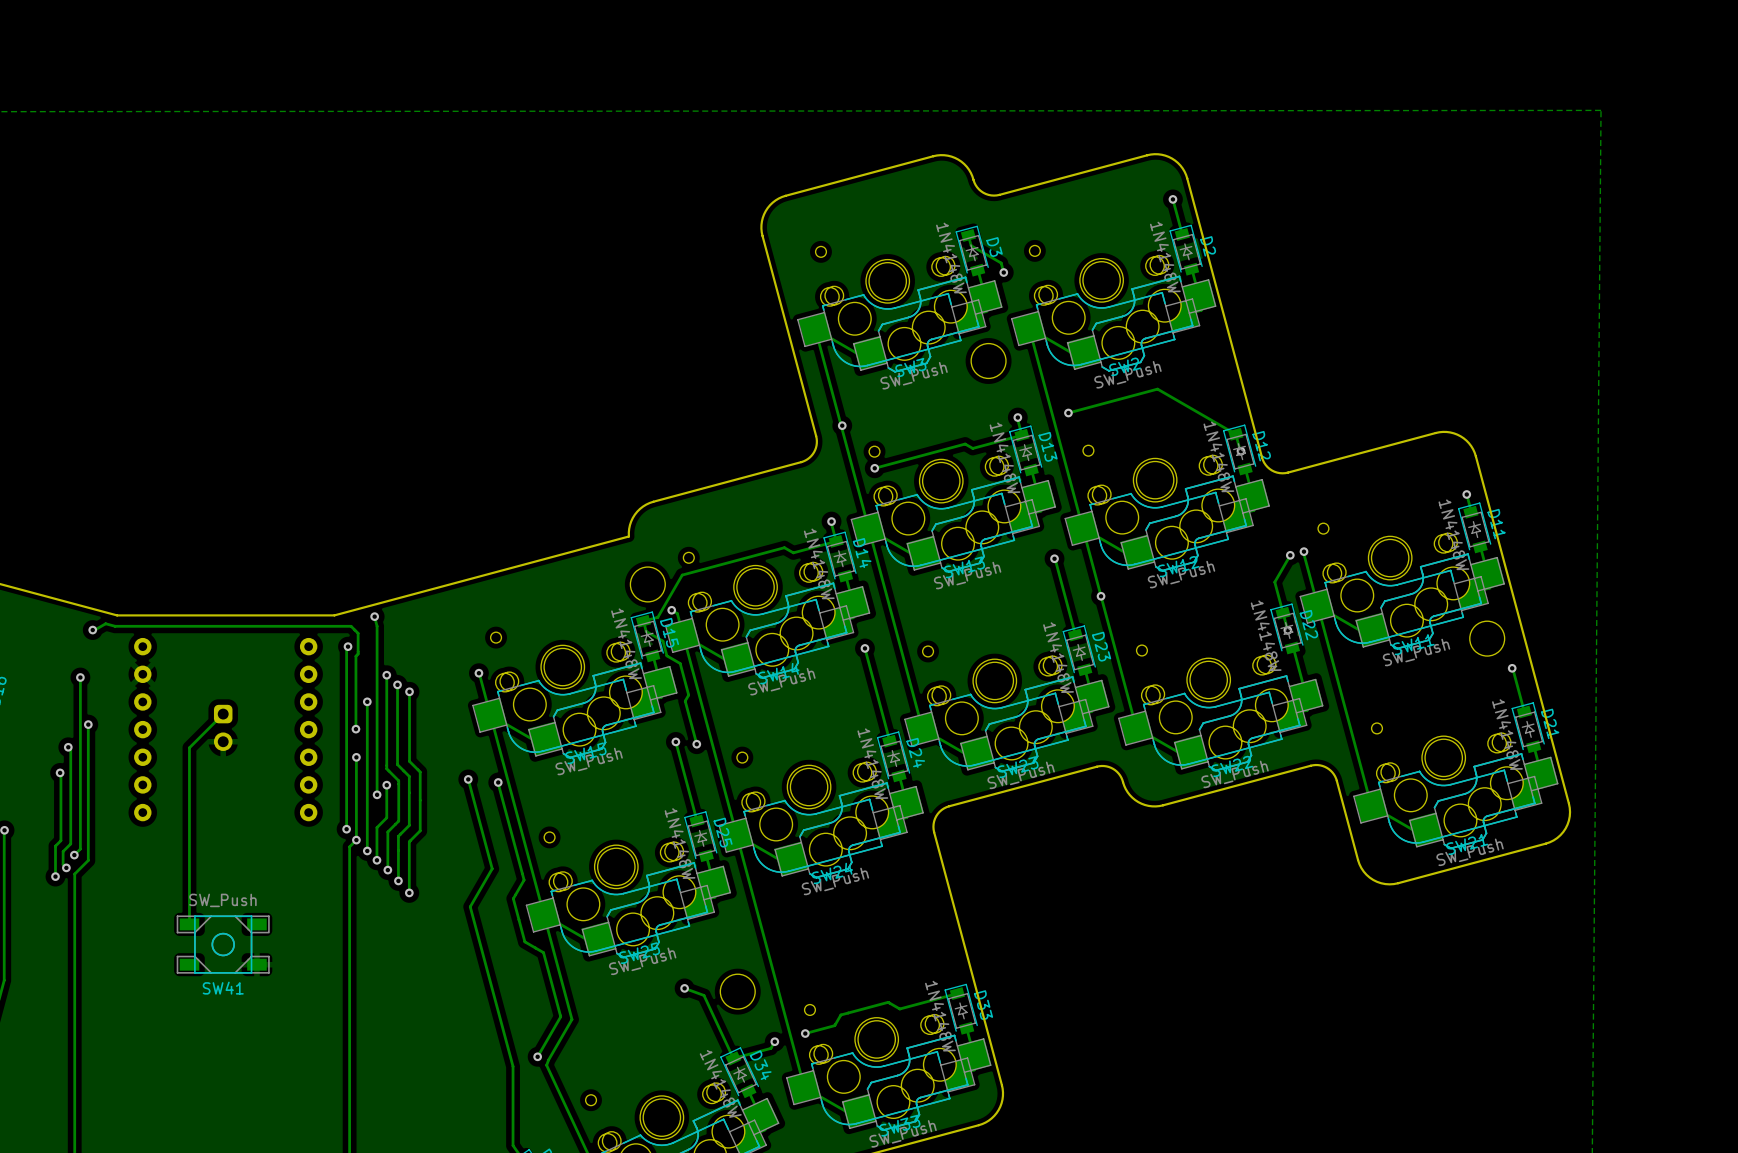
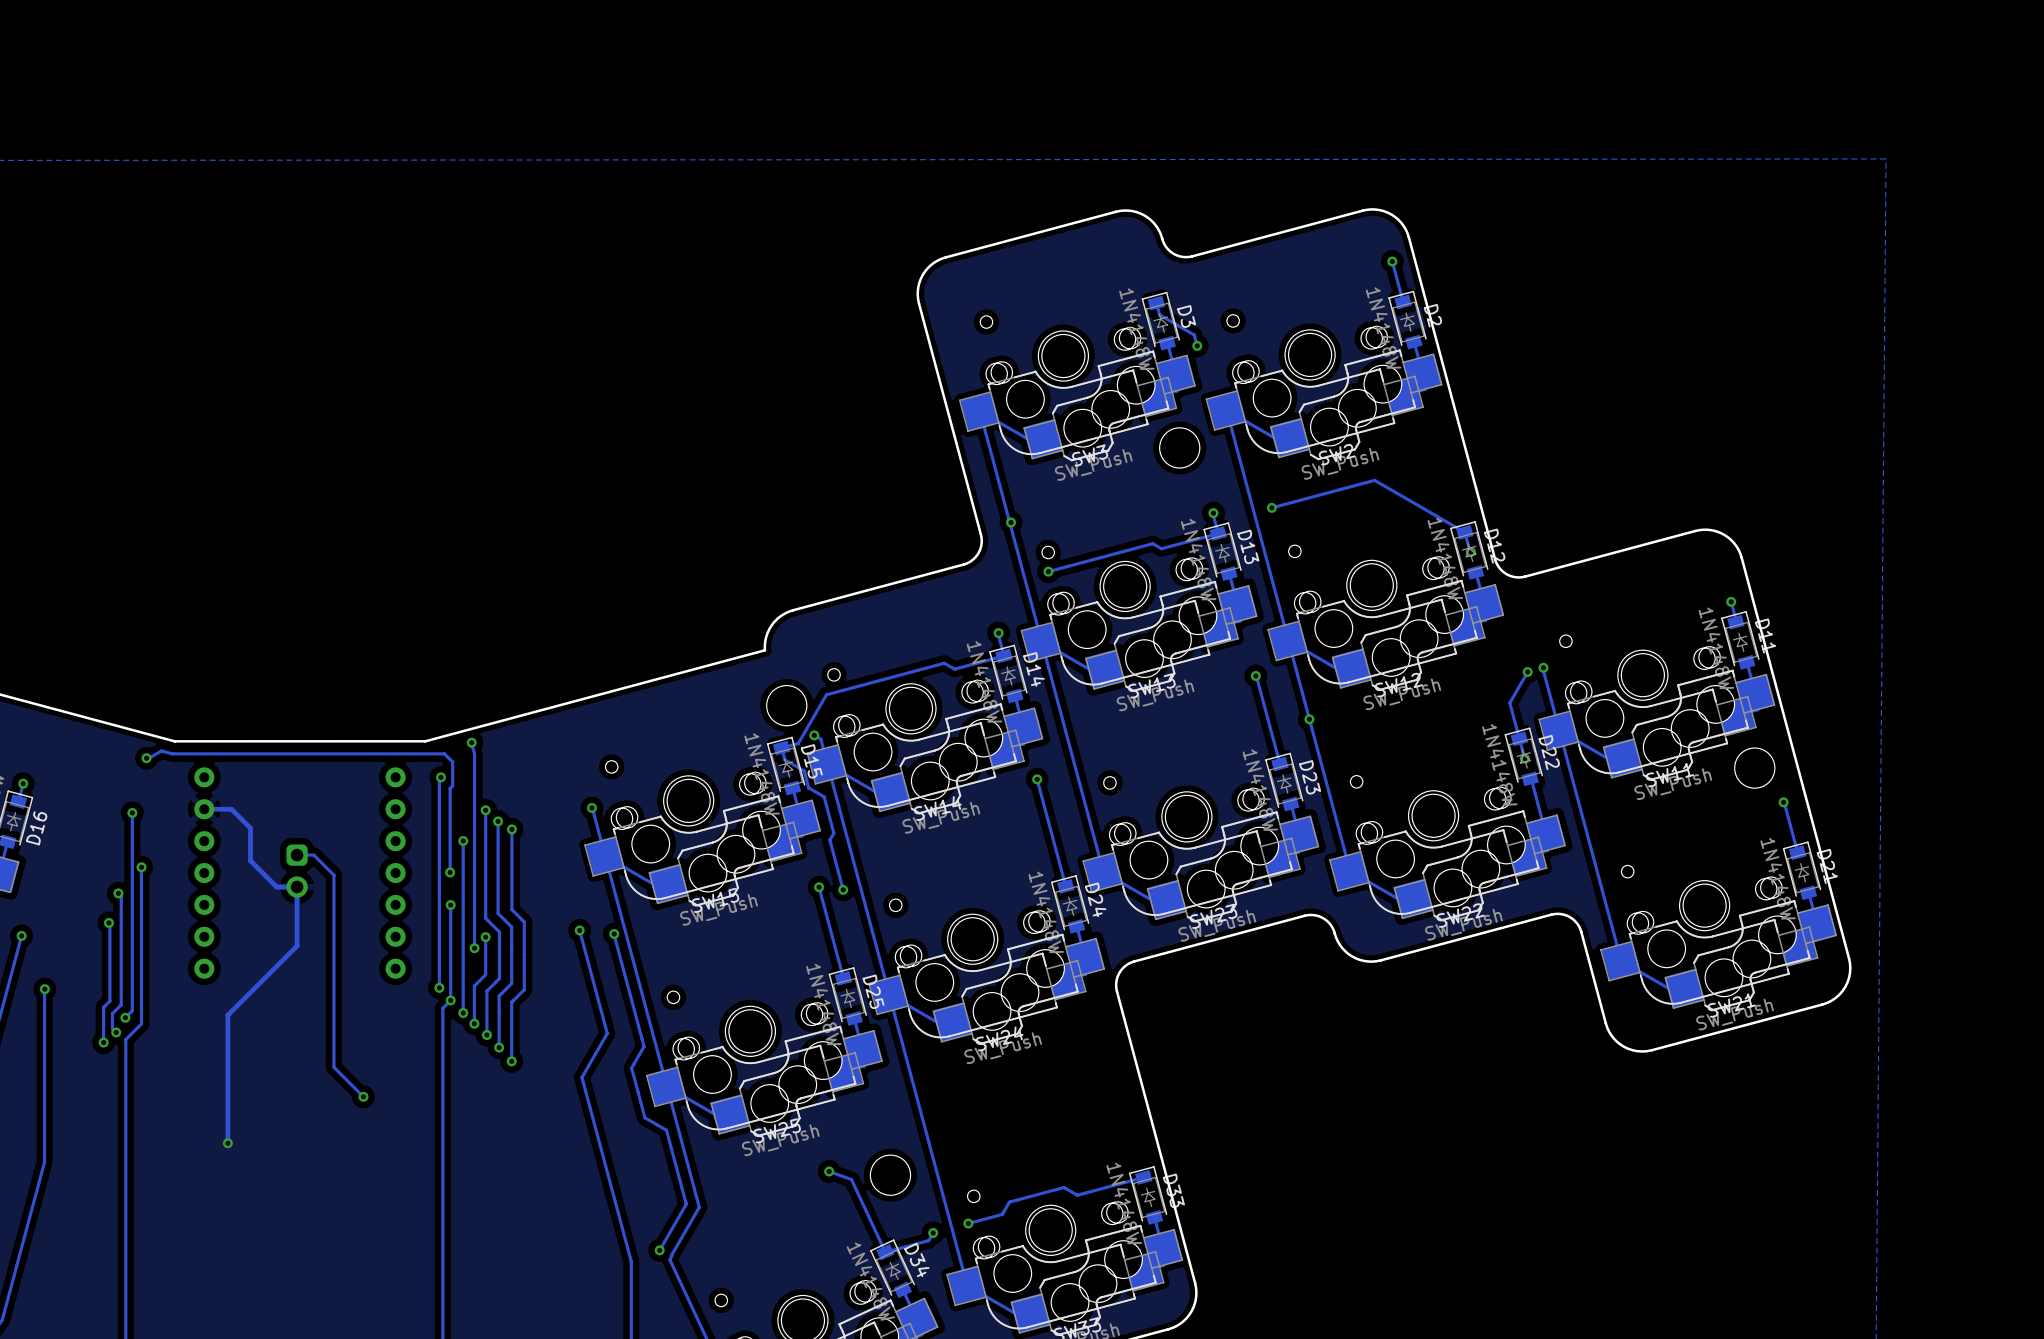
track: none -> (204, 809) (231, 809) (250, 828) (250, 860) (276, 887) (297, 887) (297, 946) (227, 1015) (227, 1143)
track: (223, 714) (189, 747) (189, 924) -> (297, 855) (313, 855) (333, 875) (333, 1067) (363, 1096)
via: none -> (363, 1096)
SW41: SW_Push (223, 944) -> none
via: none -> (227, 1143)

